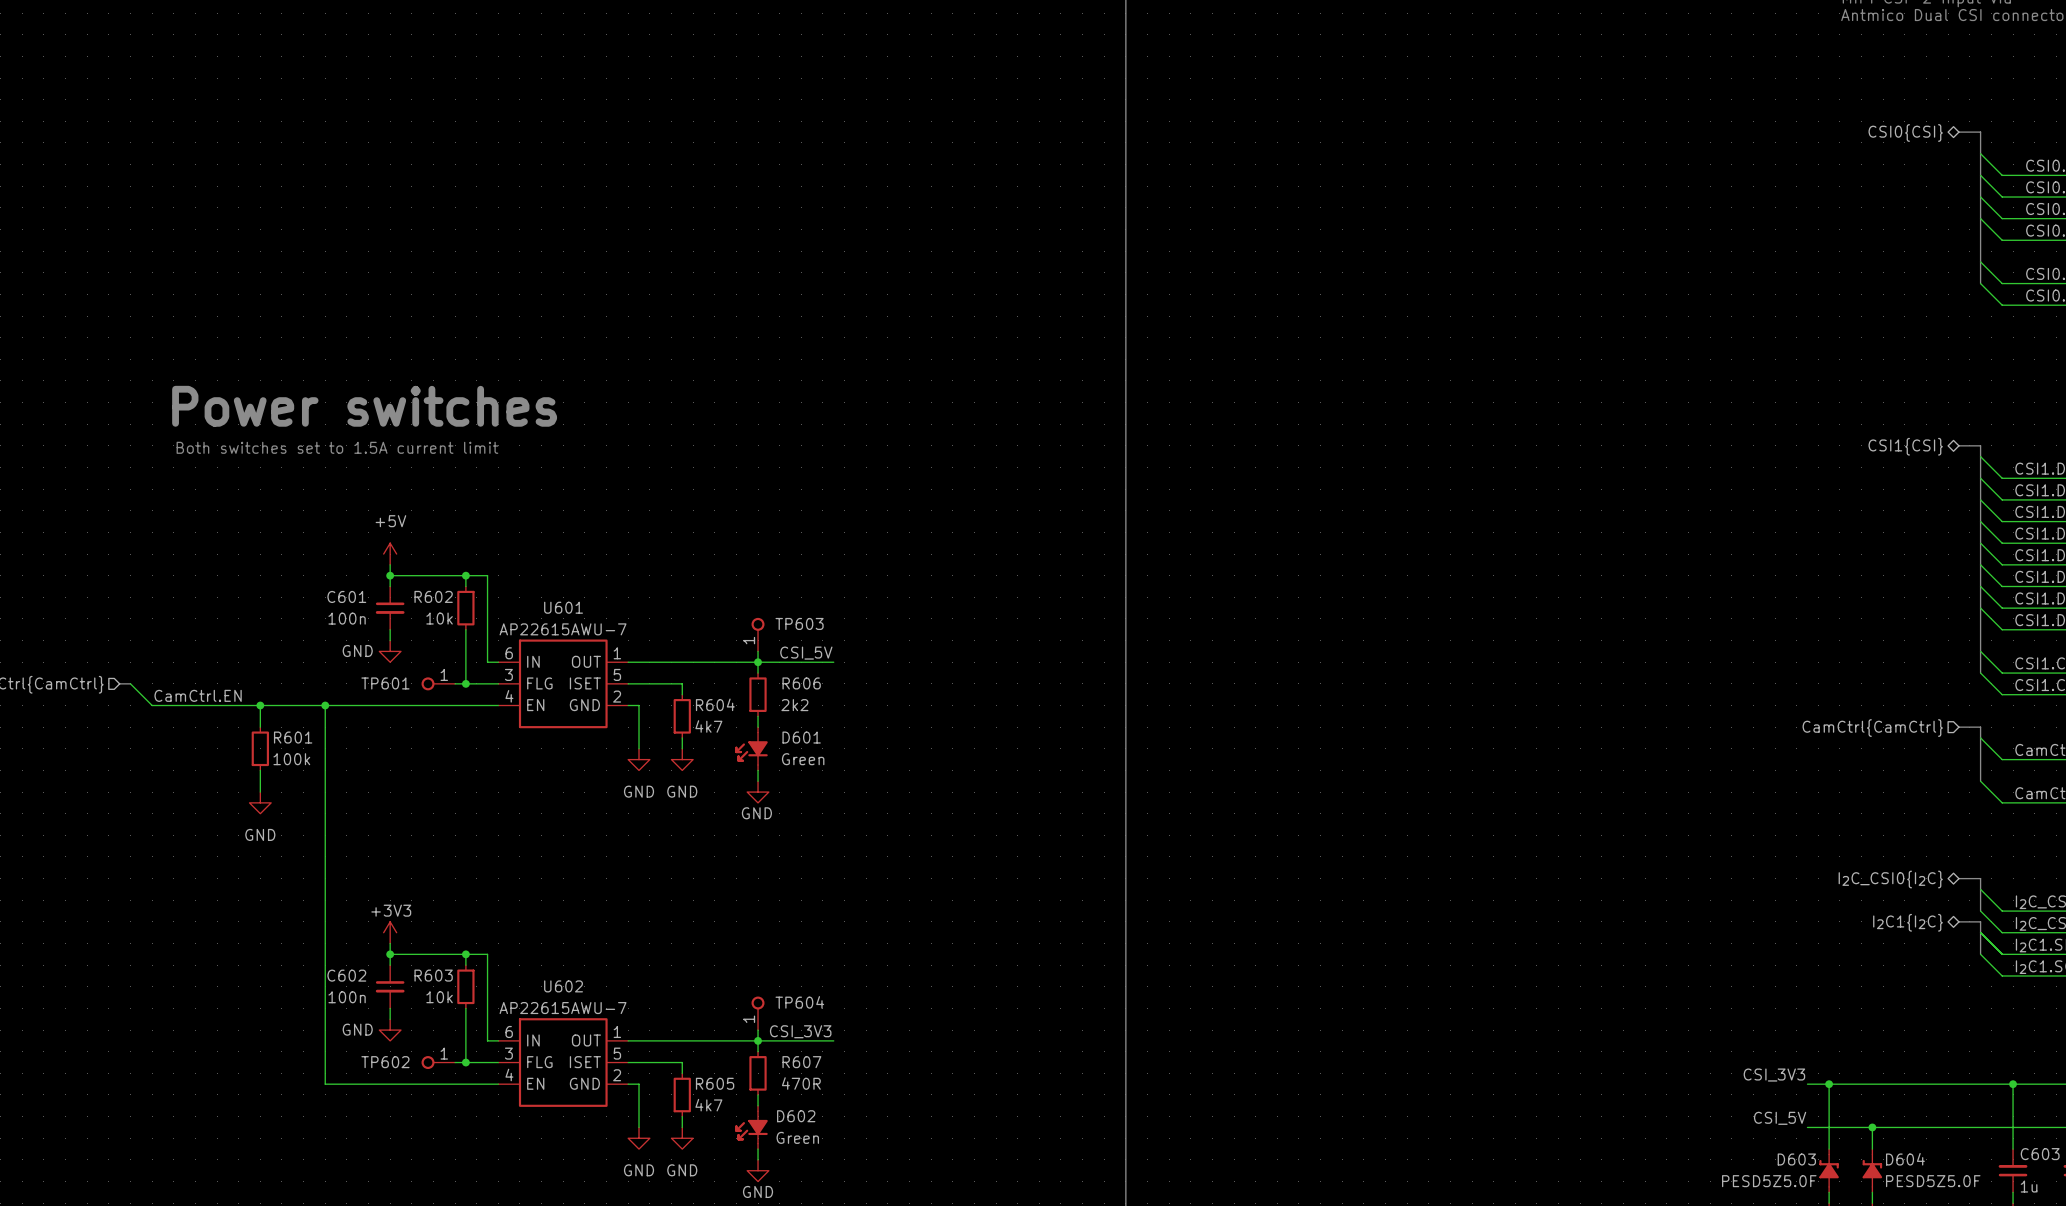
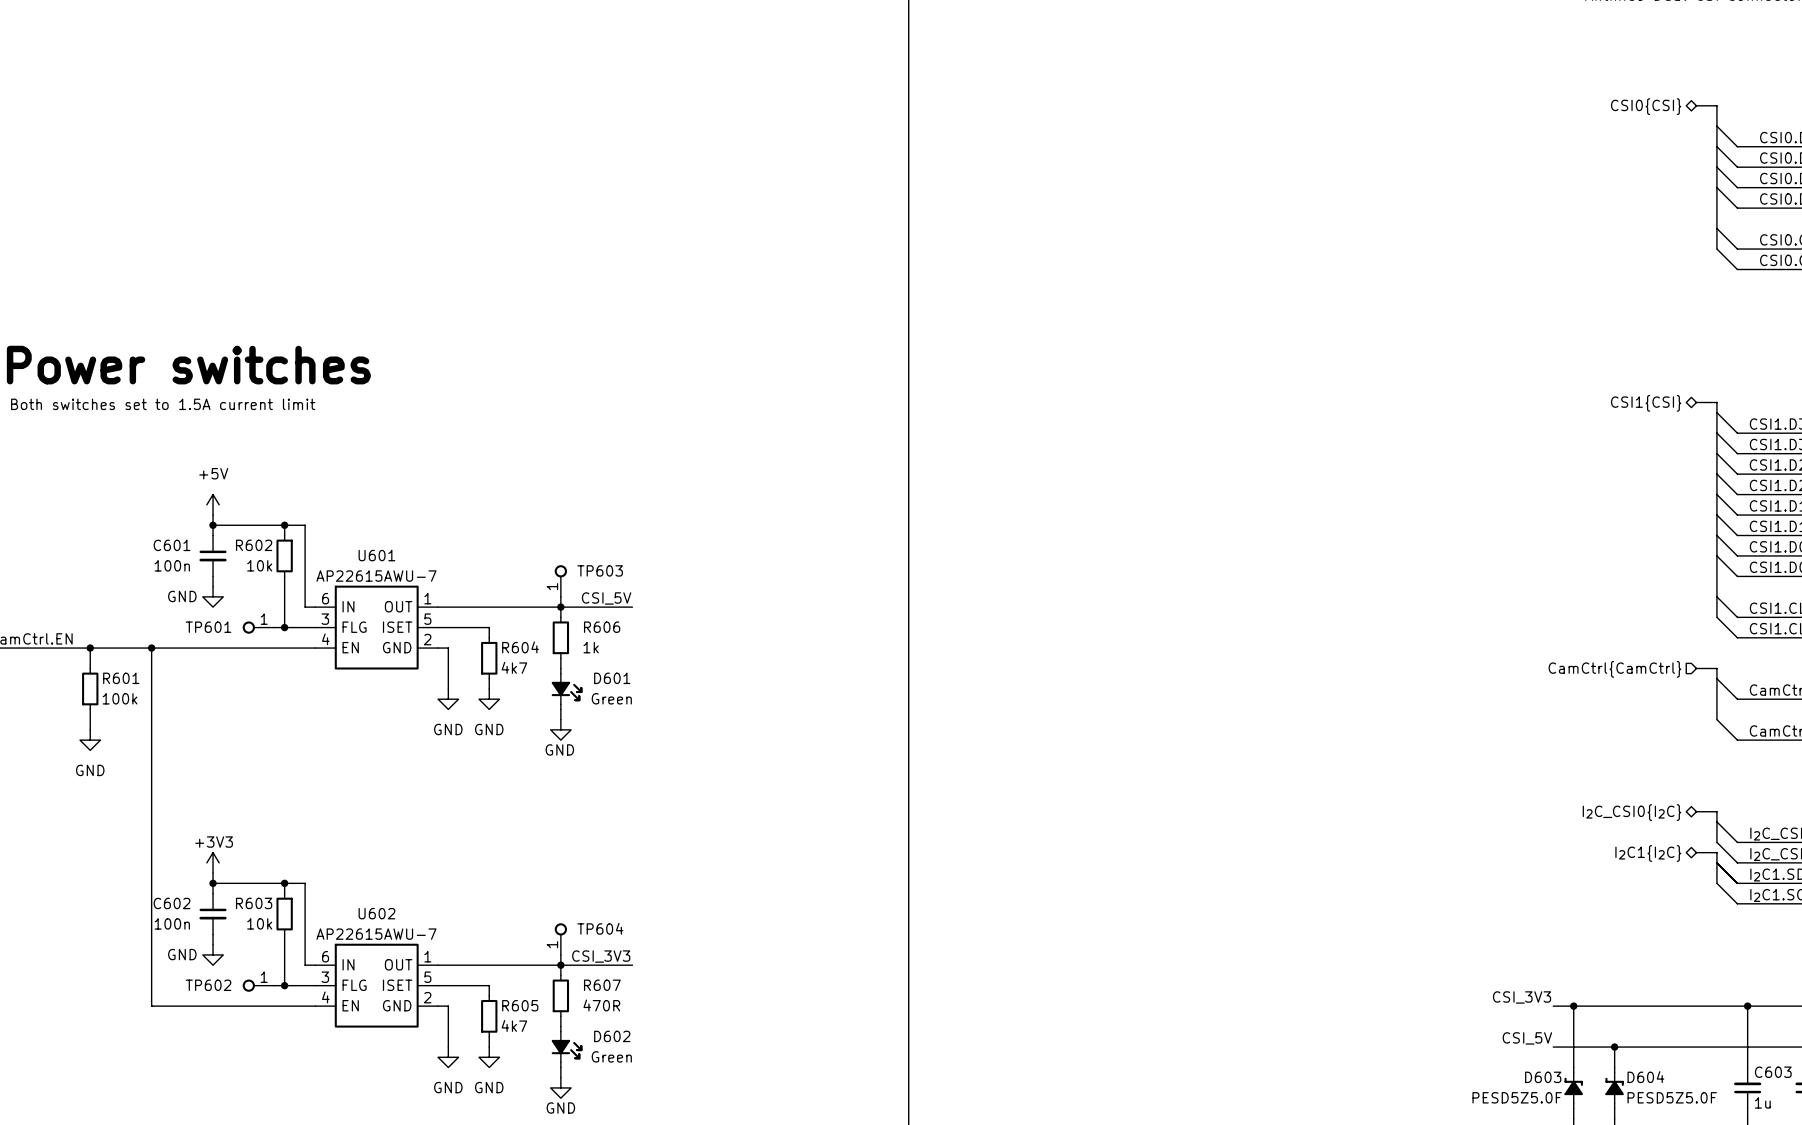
R606 text: 2k2 (794, 705) -> 1k (591, 647)
D601 flip: as is (751, 748) -> left-right (567, 688)
D602 flip: as is (751, 1127) -> left-right (567, 1047)

